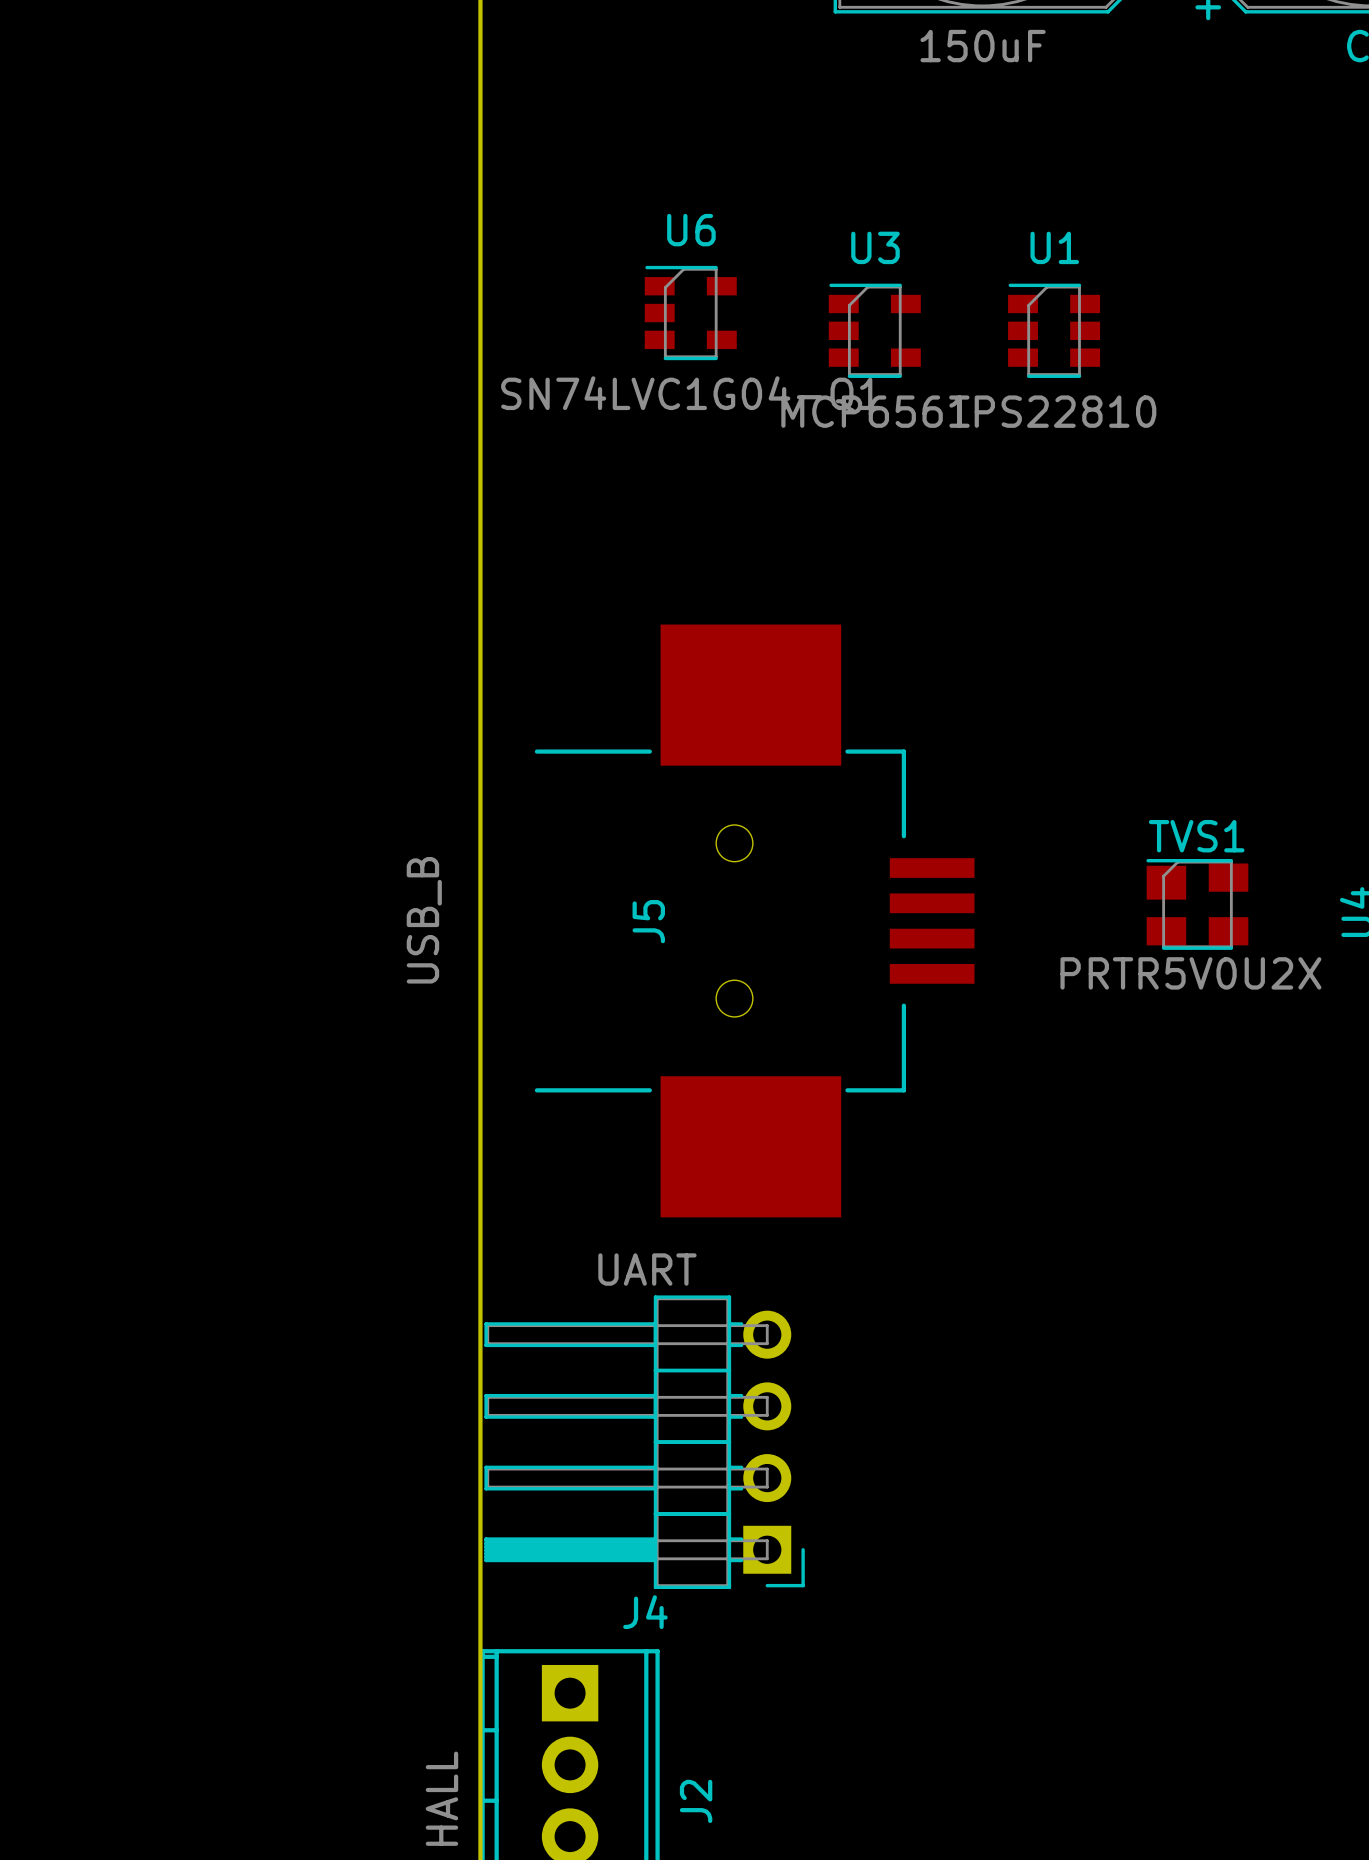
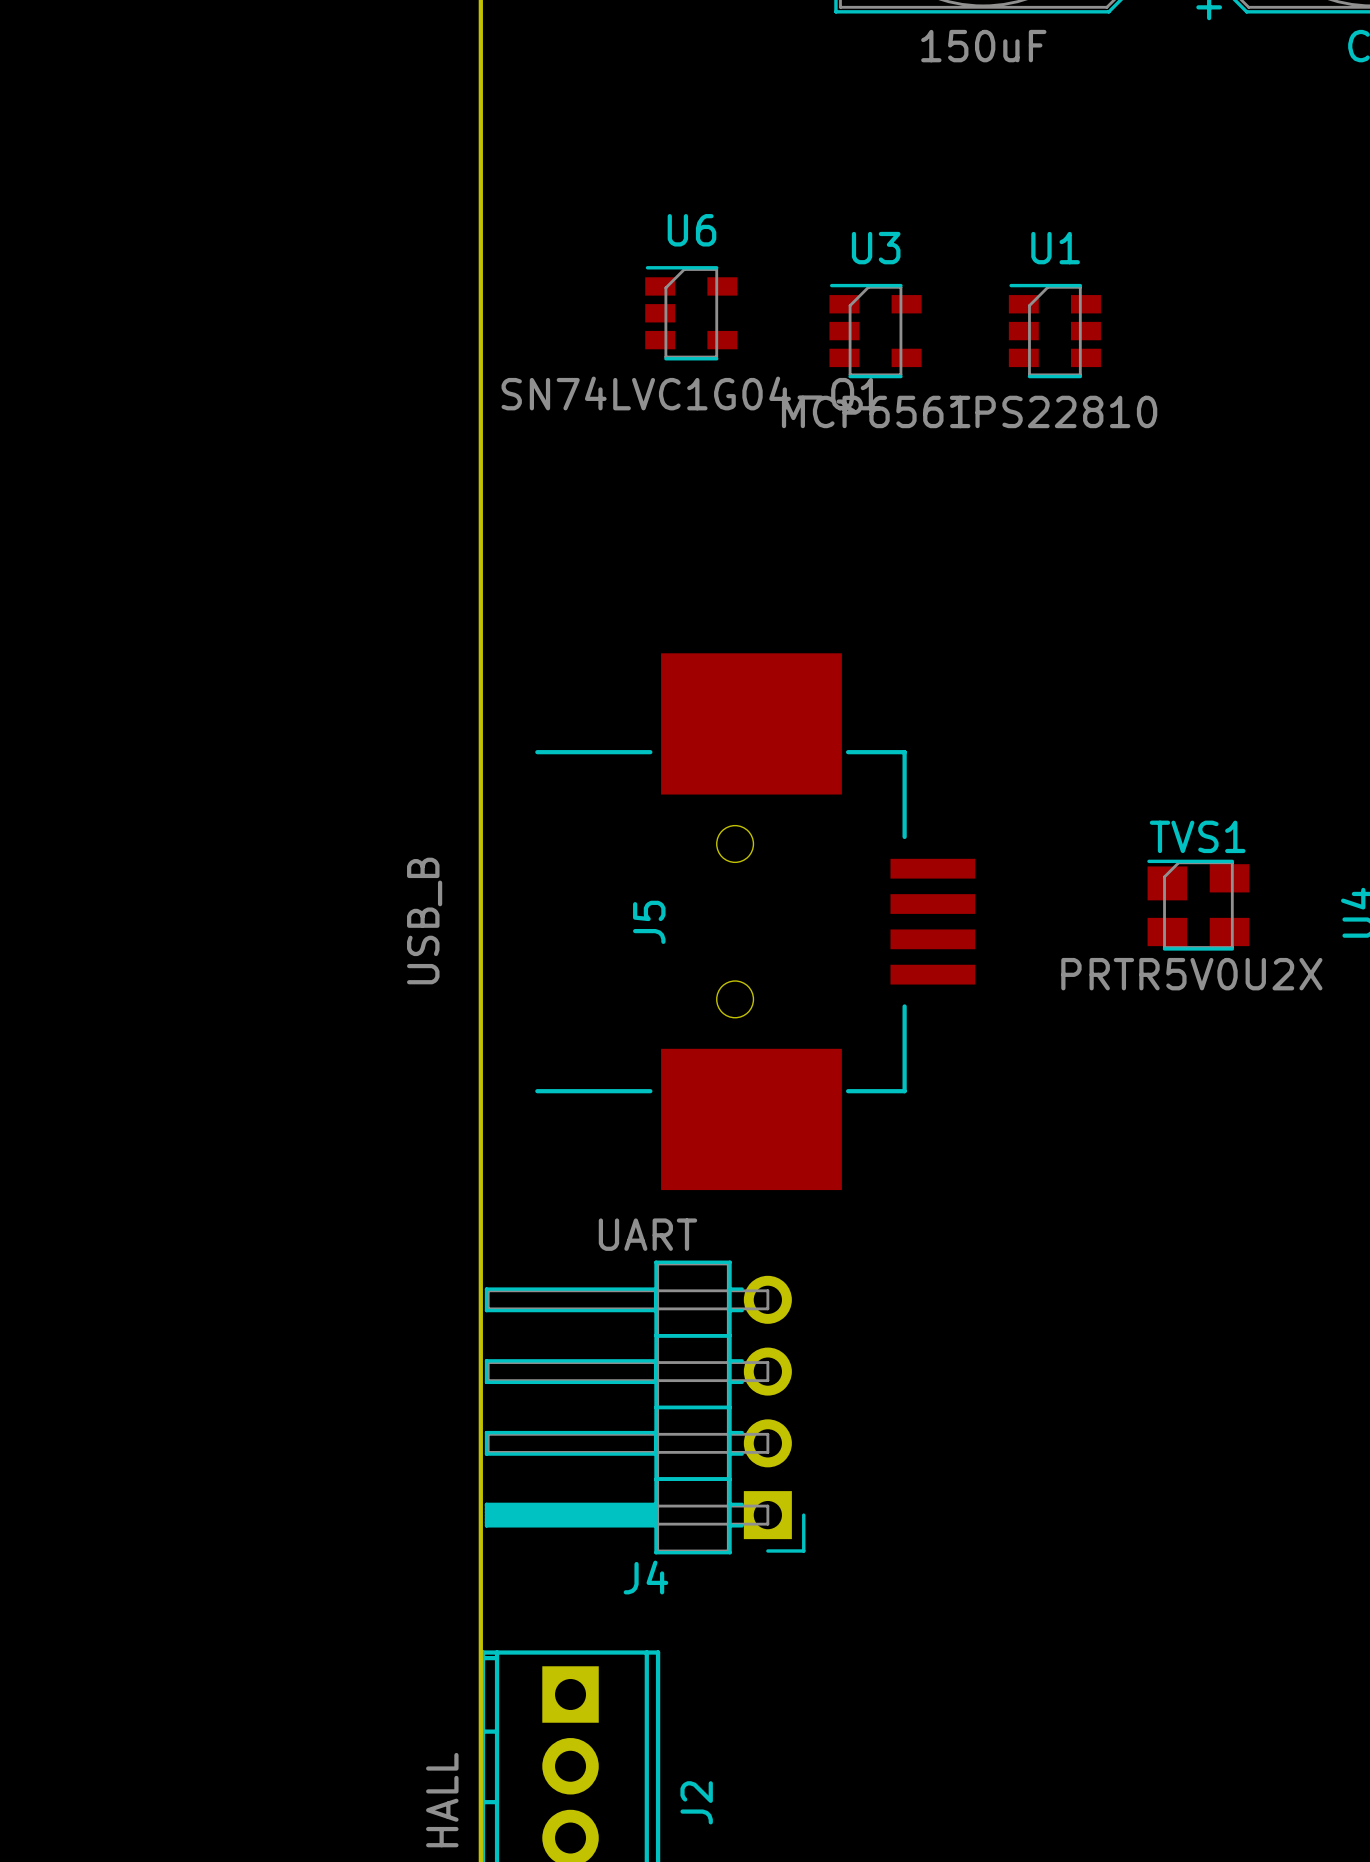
J5 footprint: [534, 624, 975, 1218] -> [535, 653, 976, 1191]
J4 position: (644, 1442) -> (645, 1407)

